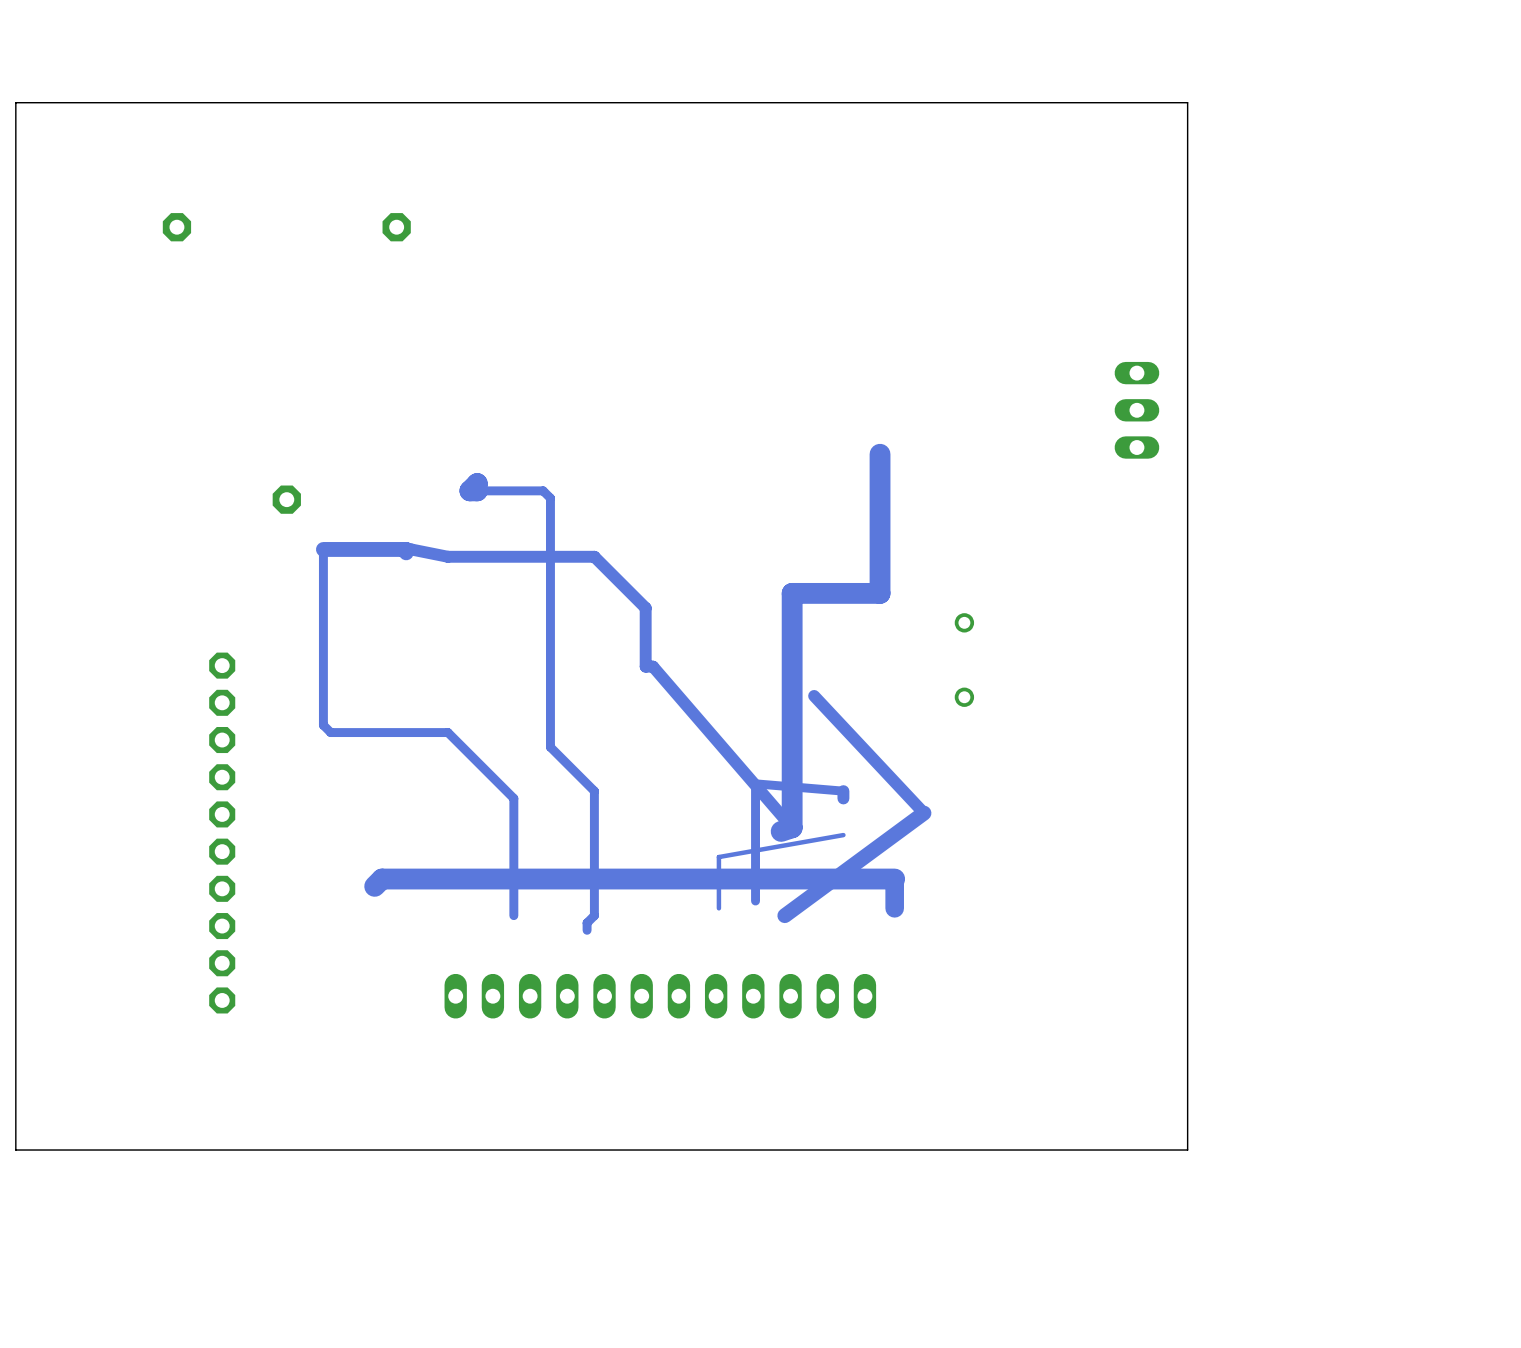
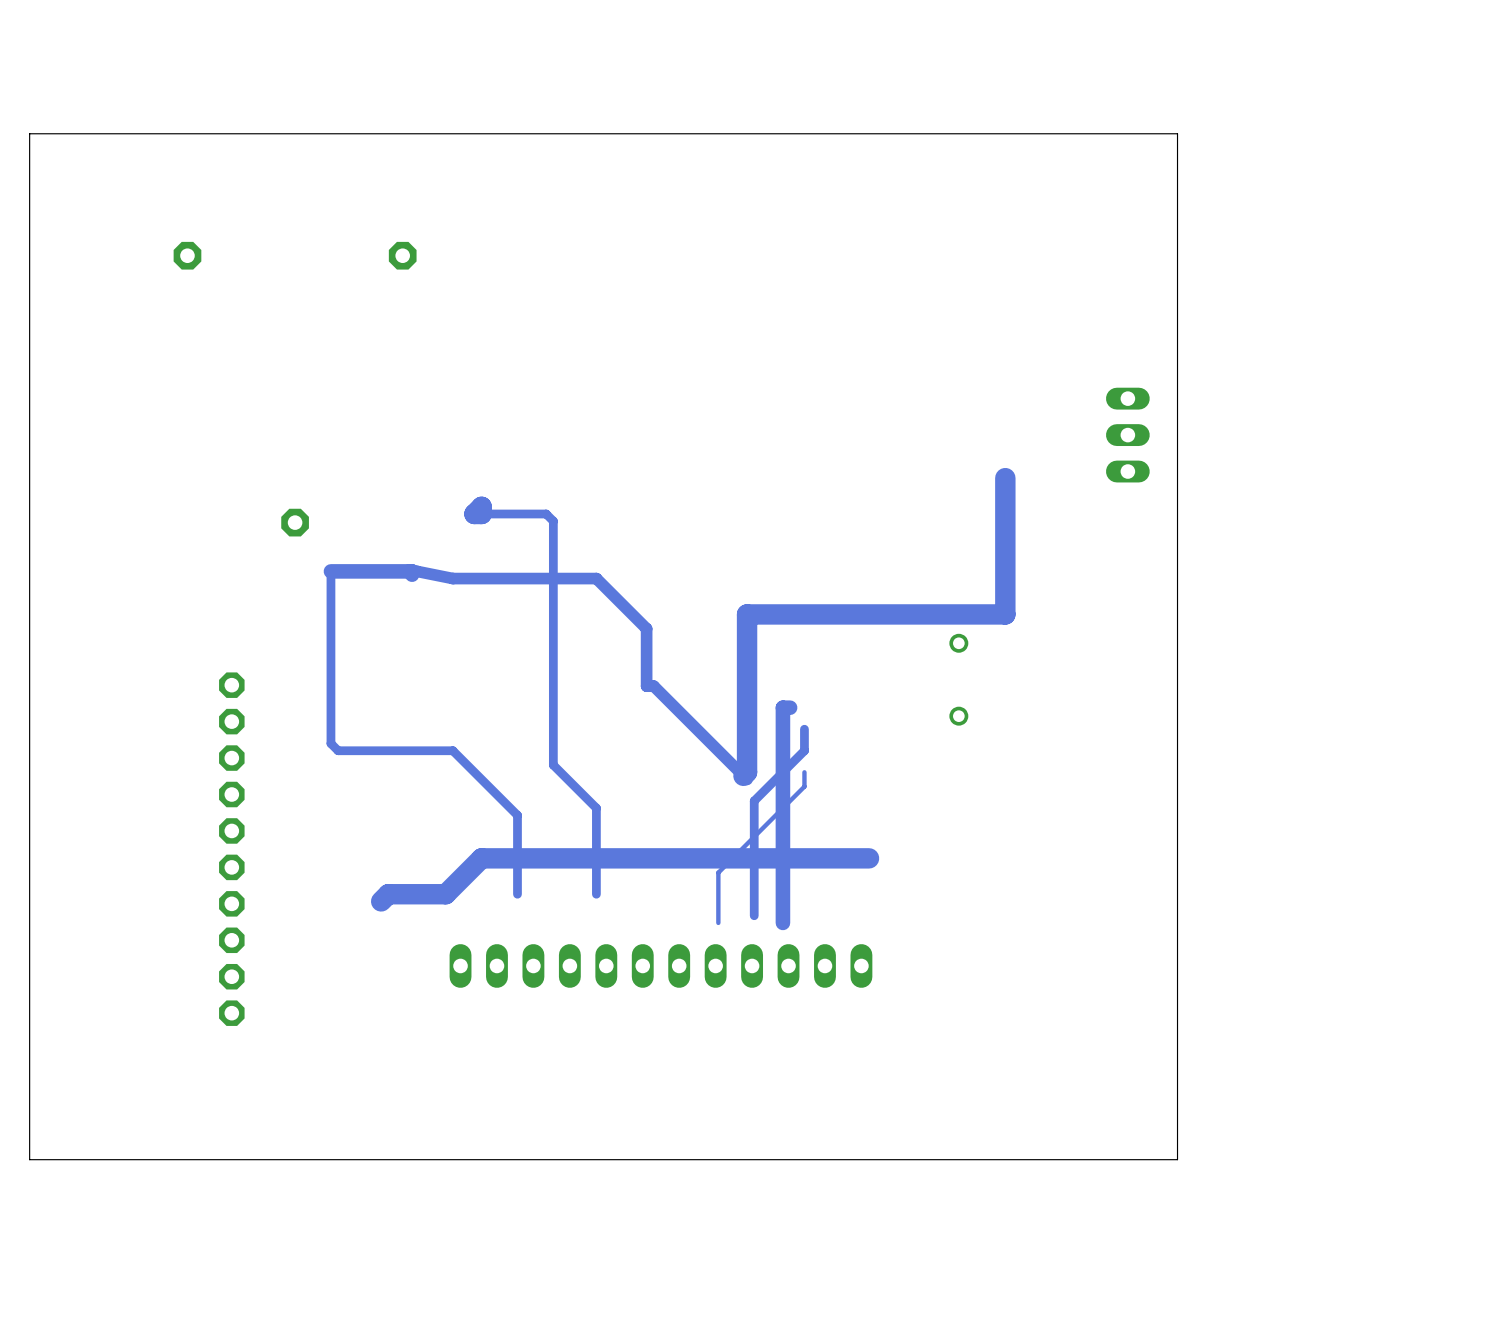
track: (880, 454) (880, 593) -> (1005, 478) (1005, 614) (876, 614)
track: (792, 593) (792, 827) -> (790, 614) (747, 614) (747, 772) (743, 775)
track: (653, 666) (792, 827) -> (653, 686) (747, 779)
track: none -> (790, 707) (782, 707) (782, 922)
track: (814, 695) (923, 813) (784, 915) -> none
track: (755, 783) (843, 791) (843, 798) -> (754, 800) (804, 750) (804, 729)
track: (792, 827) (781, 831) (784, 827) -> none
track: (843, 835) (718, 857) -> (804, 772) (804, 786) (718, 872)
track: (440, 879) (894, 879) (894, 908) -> (445, 894) (481, 858) (869, 858)
track: (513, 879) (513, 915) -> none
track: (594, 879) (594, 915) (587, 922) (587, 930) -> none
part position: (660, 996) -> (660, 965)

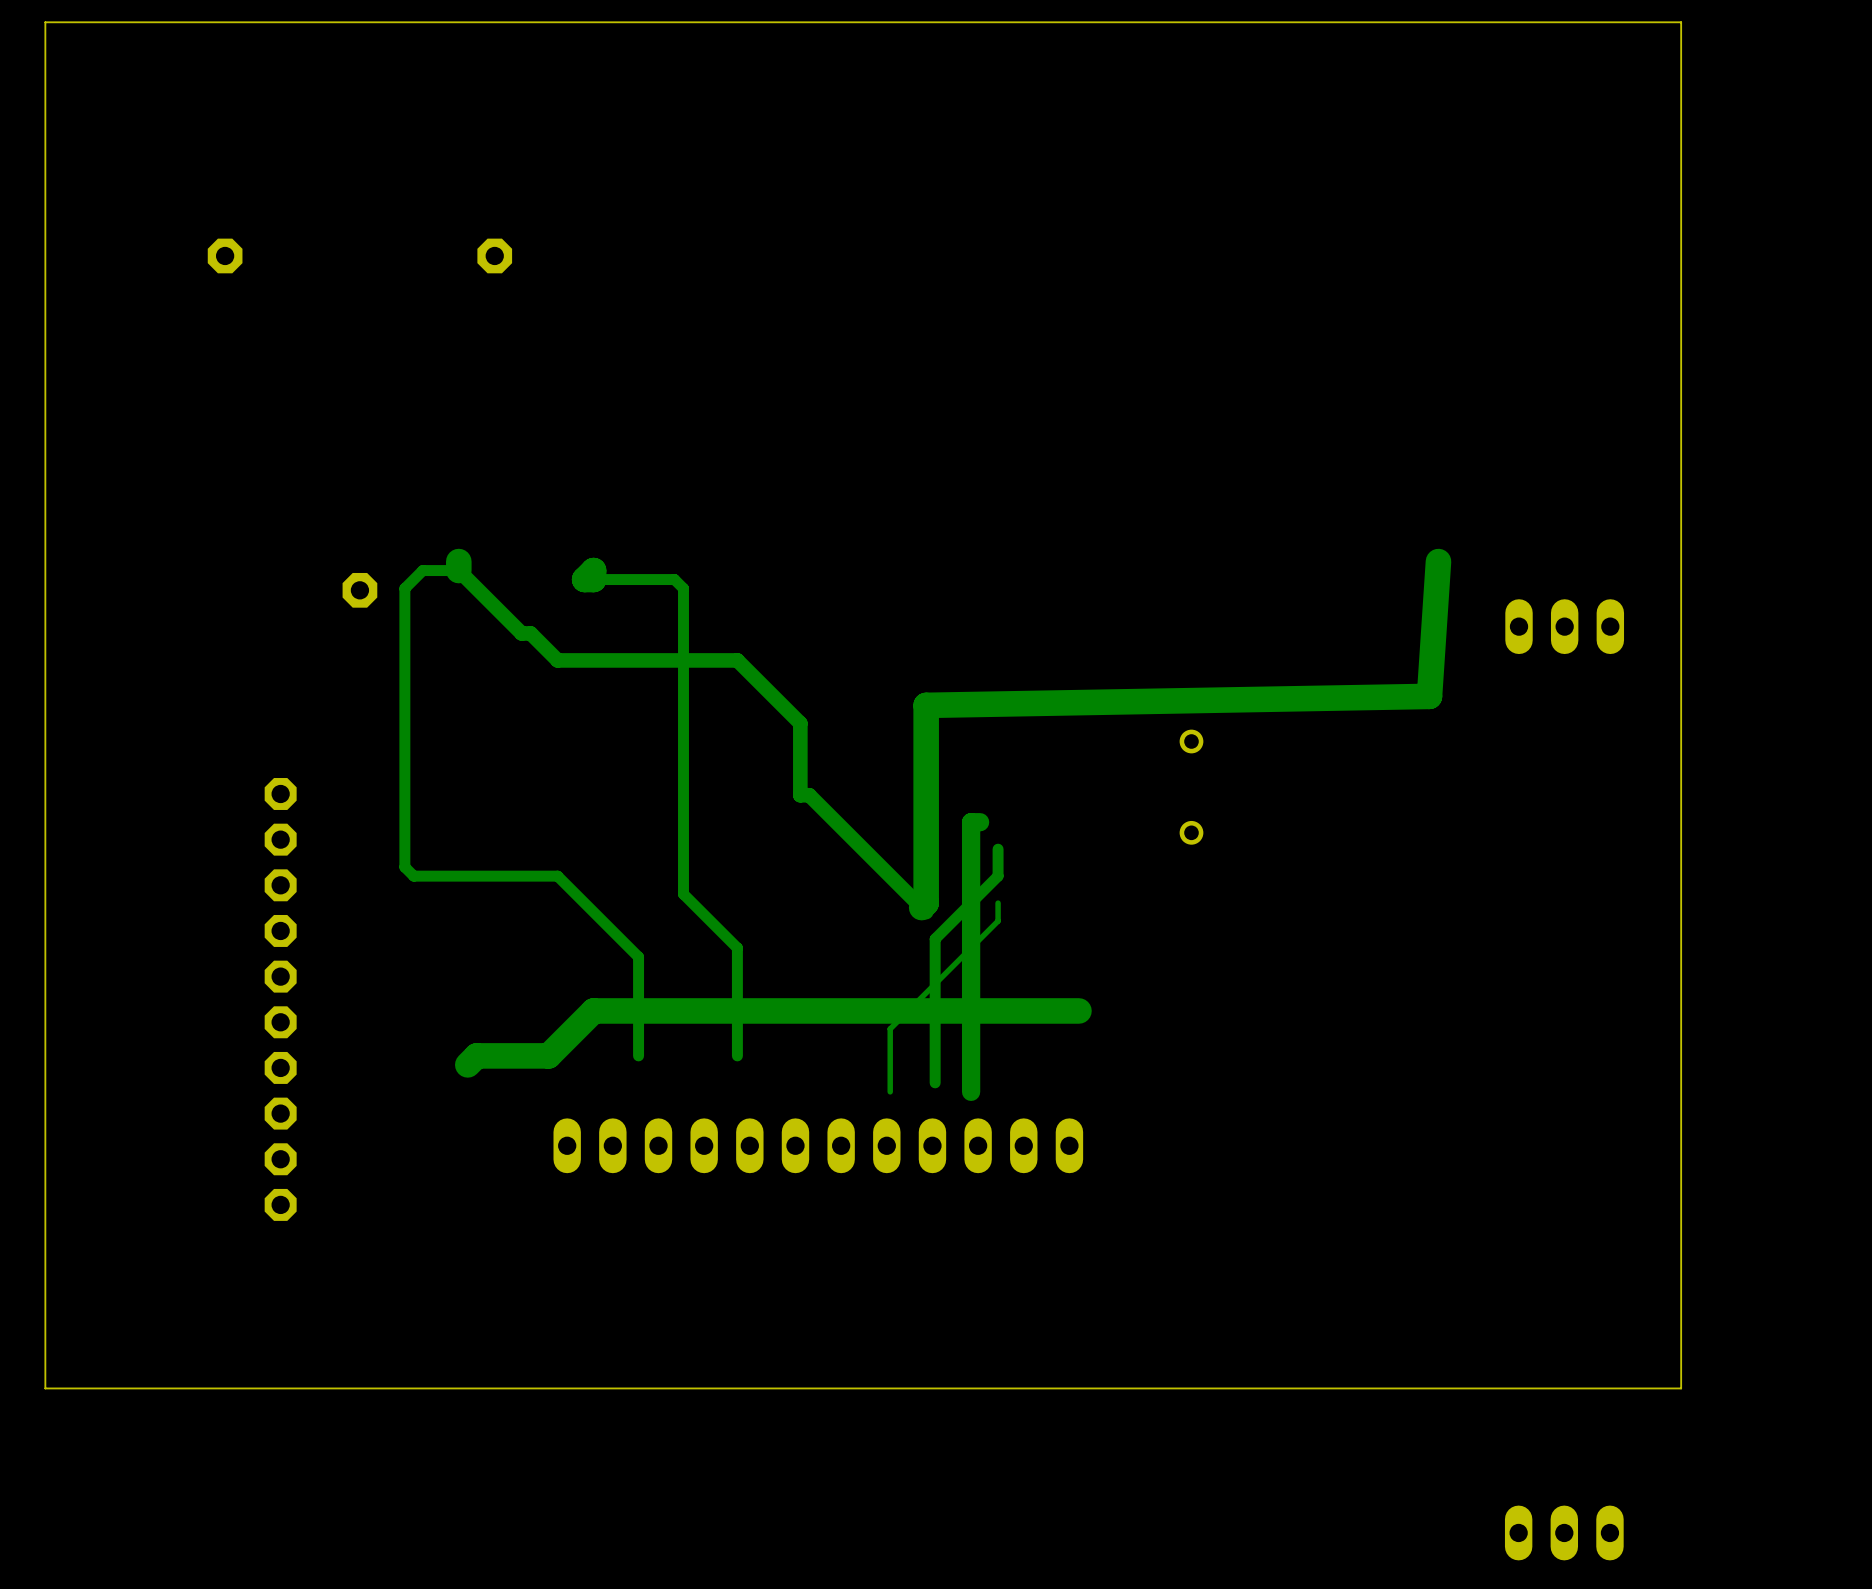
part rotation: 0° (1127, 435) -> 90° clockwise (1564, 626)
part position: (1127, 435) -> (1564, 626)
track: (1005, 478) (1005, 614) (747, 614) -> (1438, 561) (1429, 696) (926, 705)
track: none -> (458, 561) (458, 570)
track: (330, 571) (412, 571) (412, 574) -> (404, 651) (404, 588) (422, 570) (458, 570)
track: (409, 571) (452, 578) -> (458, 570) (521, 633) (530, 633) (557, 660)
board edge: (1177, 1159) (1177, 133) (29, 133) (29, 1159) (43, 1159) -> (1465, 1388) (1681, 1388) (1681, 22) (45, 22) (45, 1388)
part: none -> (1564, 1532)

